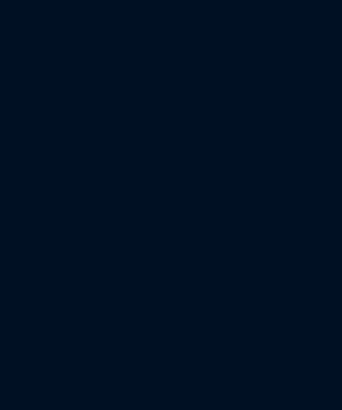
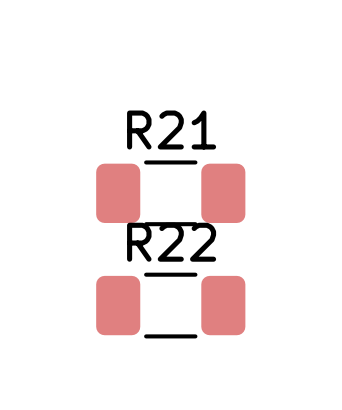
R21: none -> (170, 193)
R22: none -> (170, 305)

